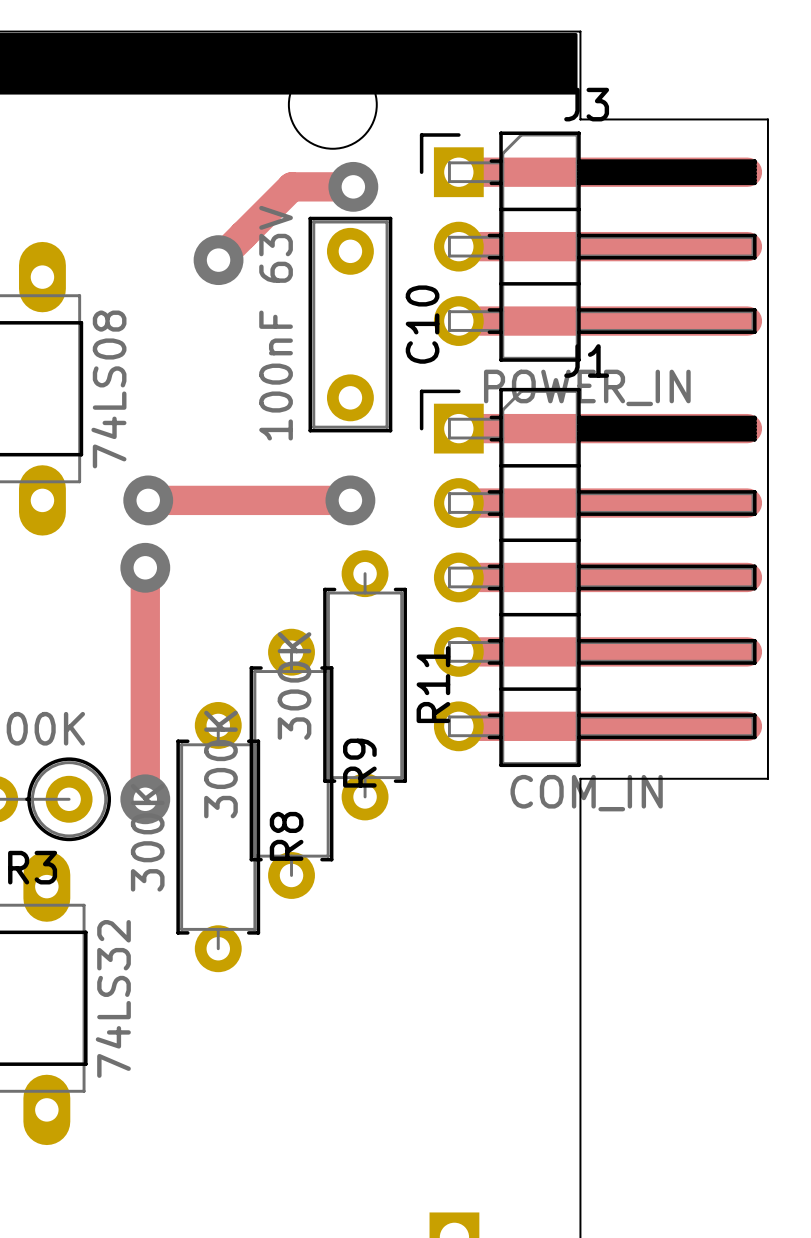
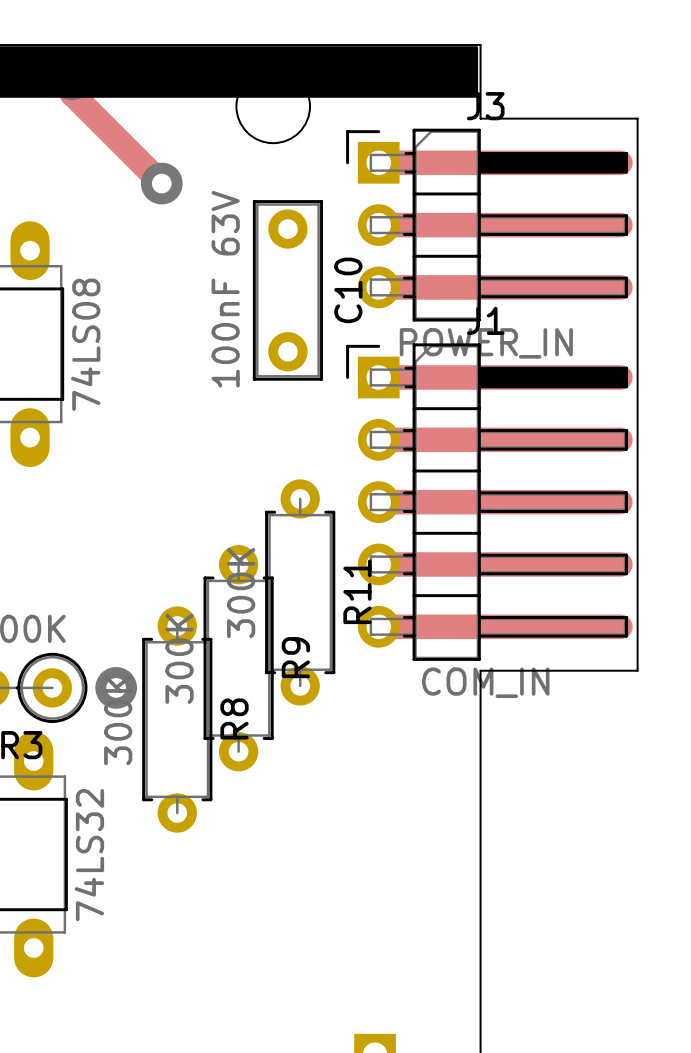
track: none -> (72, 79) (72, 93) (161, 183)
track: (353, 186) (291, 186) (218, 260) -> none
via: (353, 186) -> none
via position: (218, 260) -> (161, 183)
track: (148, 500) (350, 500) -> none
via: (148, 500) -> none
via: (350, 500) -> none
track: (145, 567) (145, 799) -> none
via: (145, 567) -> none

